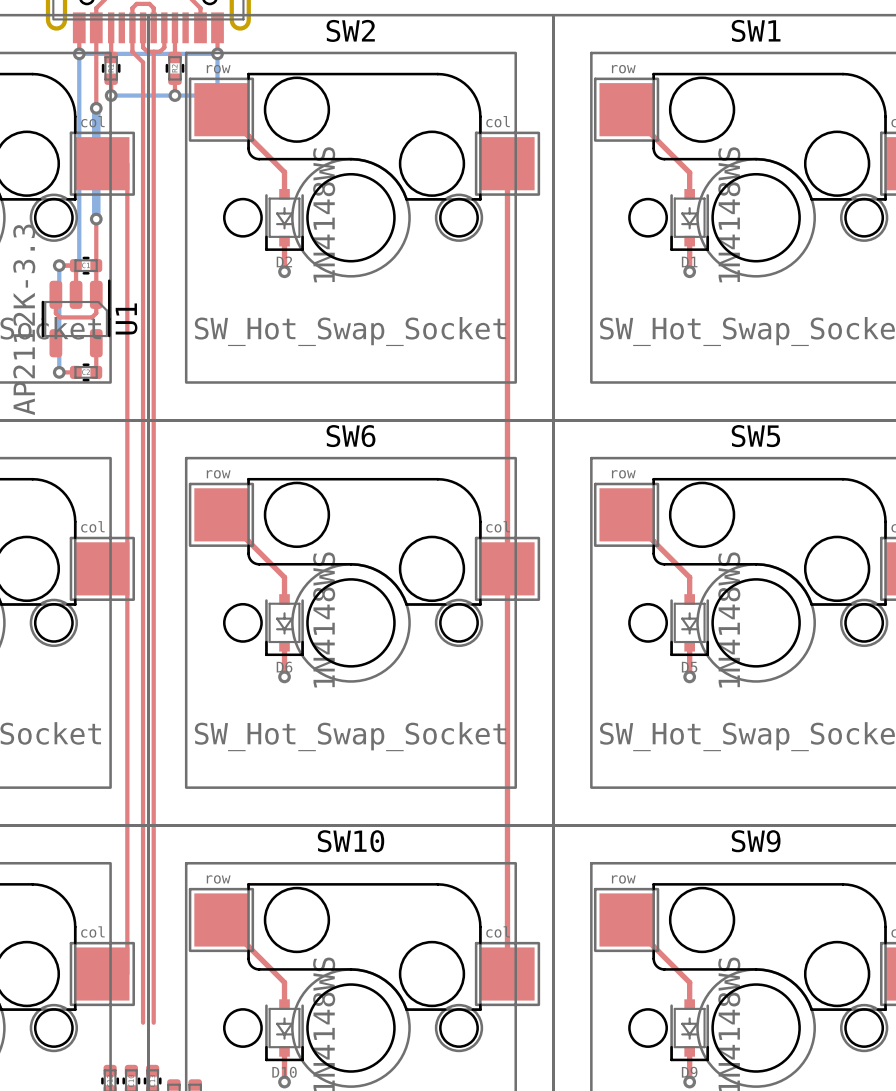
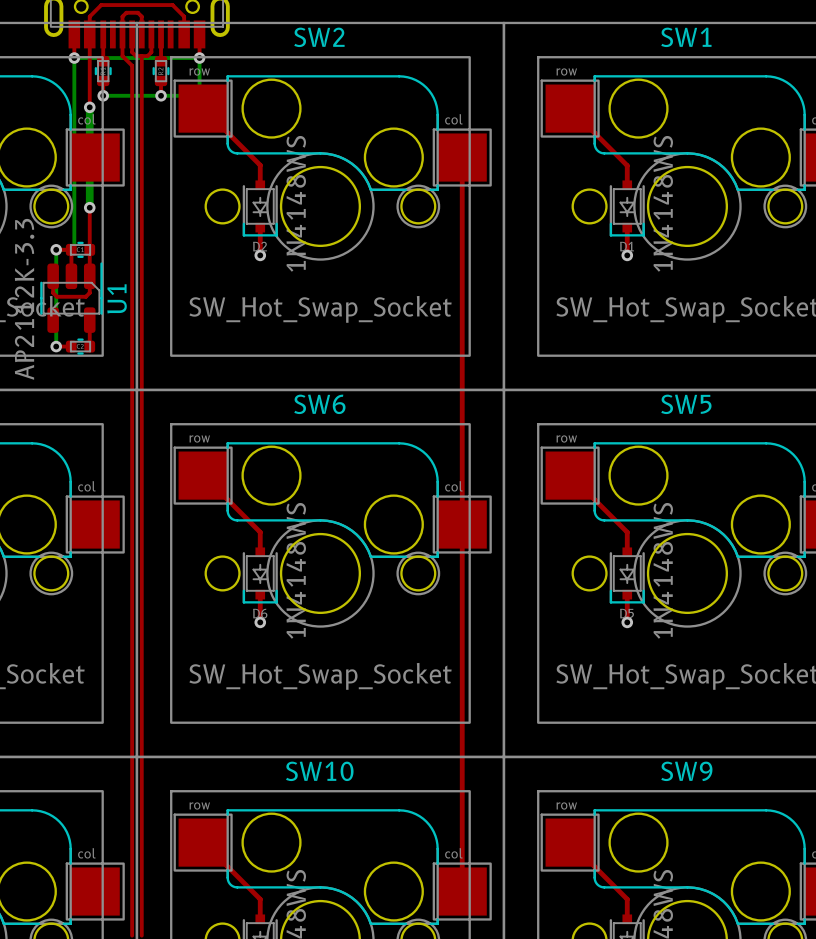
top track: (127, 163) (127, 974) -> none

